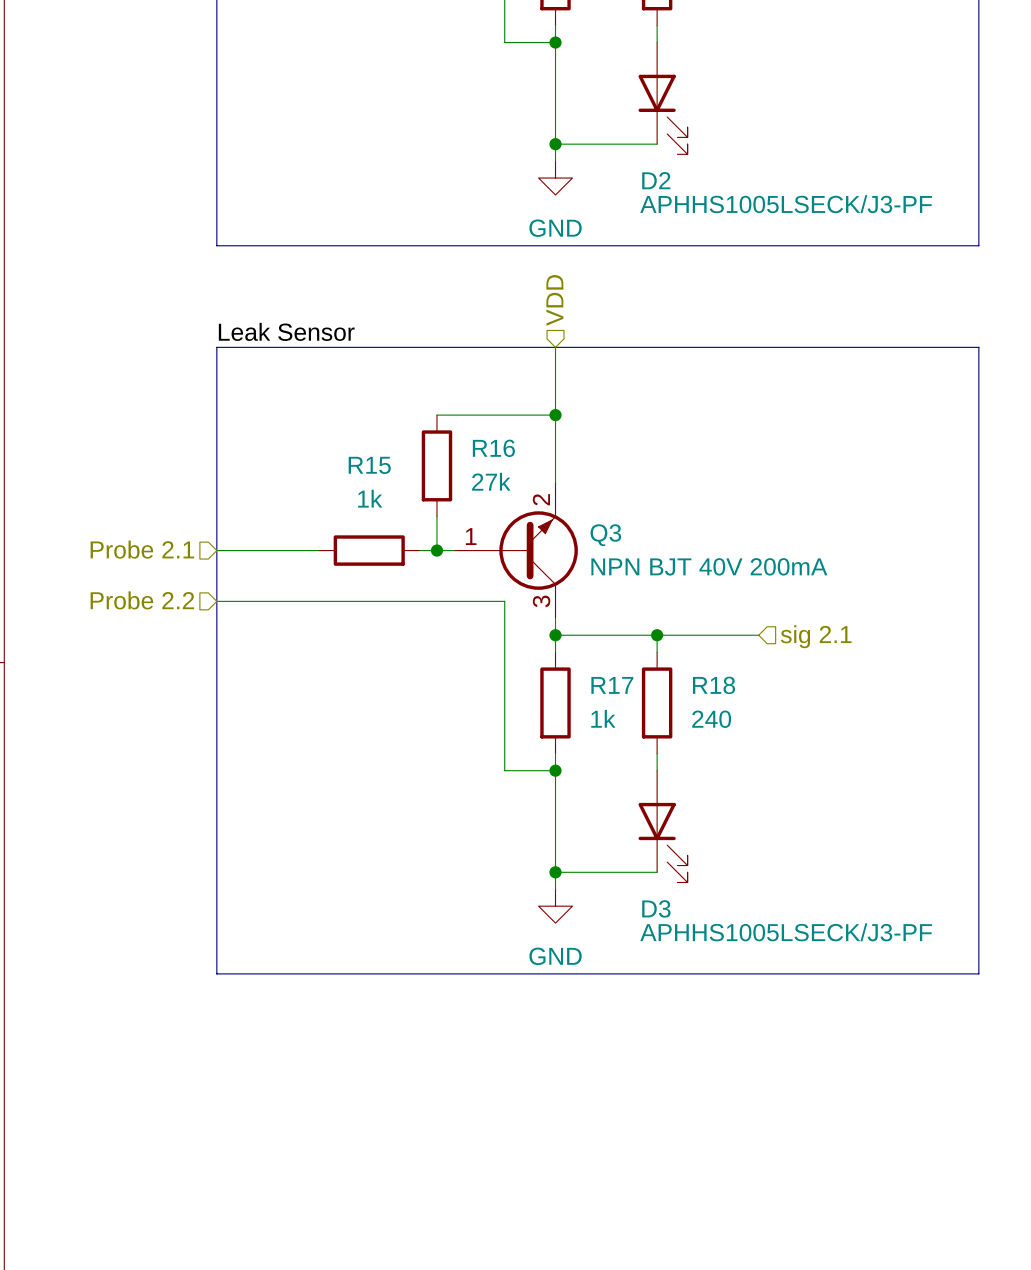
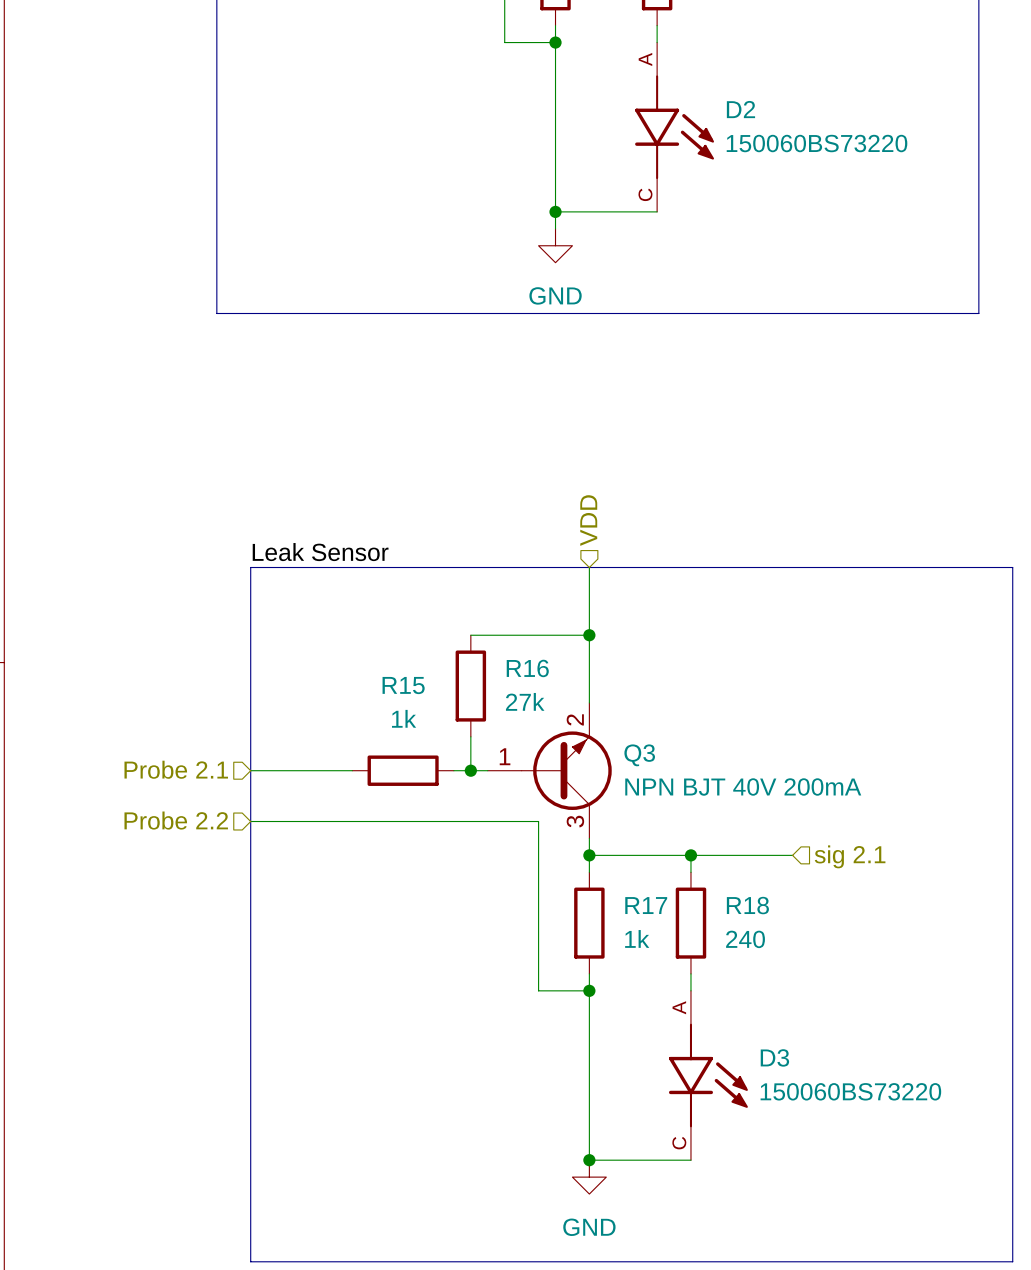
D2 symbol: [638, 42, 688, 155] -> [635, 42, 715, 212]
wire: (555, 144) (657, 144) -> (555, 211) (657, 211)
junction position: (555, 144) -> (555, 211)
wire: none -> (555, 161) (555, 228)
power symbol position: GND (555, 178) -> GND (555, 245)
D2 name position: D2 (656, 180) -> D2 (740, 109)
D2 value: APHHS1005LSECK/J3-PF (786, 204) -> 150060BS73220 (817, 143)
line: (216, 245) (978, 245) -> (216, 245) (216, 313) (978, 313) (978, 245)
hierarchical label position: VDD (554, 300) -> VDD (588, 520)
label position: Leak Sensor (286, 331) -> Leak Sensor (320, 552)
line: (216, 347) (216, 973) (978, 973) (978, 347) (216, 347) -> none
wire: (555, 347) (555, 482) -> (589, 567) (589, 702)
wire: (436, 415) (555, 415) -> none
junction: (555, 415) -> none
R16 position: (436, 465) -> (470, 686)
wire: (436, 516) (436, 550) -> (470, 736) (470, 770)
hierarchical label position: Probe 2.1 (142, 549) -> Probe 2.1 (176, 769)
wire: (216, 550) (318, 550) -> (250, 770) (352, 770)
R15 position: (369, 550) -> (403, 770)
wire: (420, 550) (453, 550) -> (453, 770) (487, 770)
junction: (436, 550) -> none
Q3 position: (515, 550) -> (549, 770)
line: none -> (250, 567) (1012, 567) (1012, 1261) (250, 1261) (250, 567)
hierarchical label position: Probe 2.2 (142, 600) -> Probe 2.2 (176, 820)
wire: (216, 601) (504, 601) (504, 770) (555, 770) -> (250, 821) (538, 821) (538, 990) (589, 990)
wire: (555, 618) (555, 652) -> (589, 838) (589, 872)
wire: none -> (470, 635) (555, 635)
junction: (555, 635) -> none
wire: (589, 635) (758, 635) -> none
junction: none -> (589, 635)
wire: (657, 635) (657, 652) -> (690, 855) (690, 872)
junction: (657, 635) -> none
hierarchical label position: sig 2.1 (816, 636) -> sig 2.1 (850, 856)
R17 position: (555, 702) -> (589, 923)
R18 position: (657, 702) -> (690, 923)
wire: (555, 753) (555, 889) -> none
wire: (657, 753) (657, 770) -> (690, 973) (690, 990)
junction: none -> (470, 770)
junction: (555, 770) -> none
D3 symbol: [638, 770, 688, 883] -> [668, 990, 748, 1161]
wire: none -> (589, 855) (792, 855)
junction: none -> (690, 855)
wire: (555, 872) (657, 872) -> none
junction position: (555, 872) -> (589, 855)
power symbol position: GND (555, 906) -> GND (589, 1177)
D3 name position: D3 (656, 908) -> D3 (774, 1057)
D3 value: APHHS1005LSECK/J3-PF (786, 932) -> 150060BS73220 (850, 1091)
wire: none -> (589, 973) (589, 1160) (690, 1160)
junction: none -> (589, 990)
junction: none -> (589, 1160)

